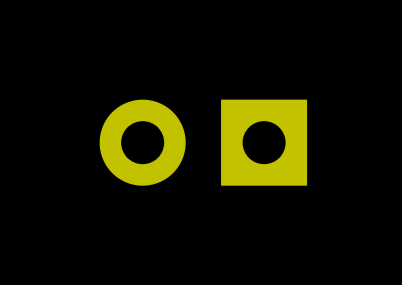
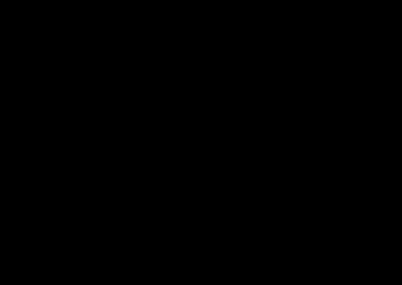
part: (203, 142) -> none

